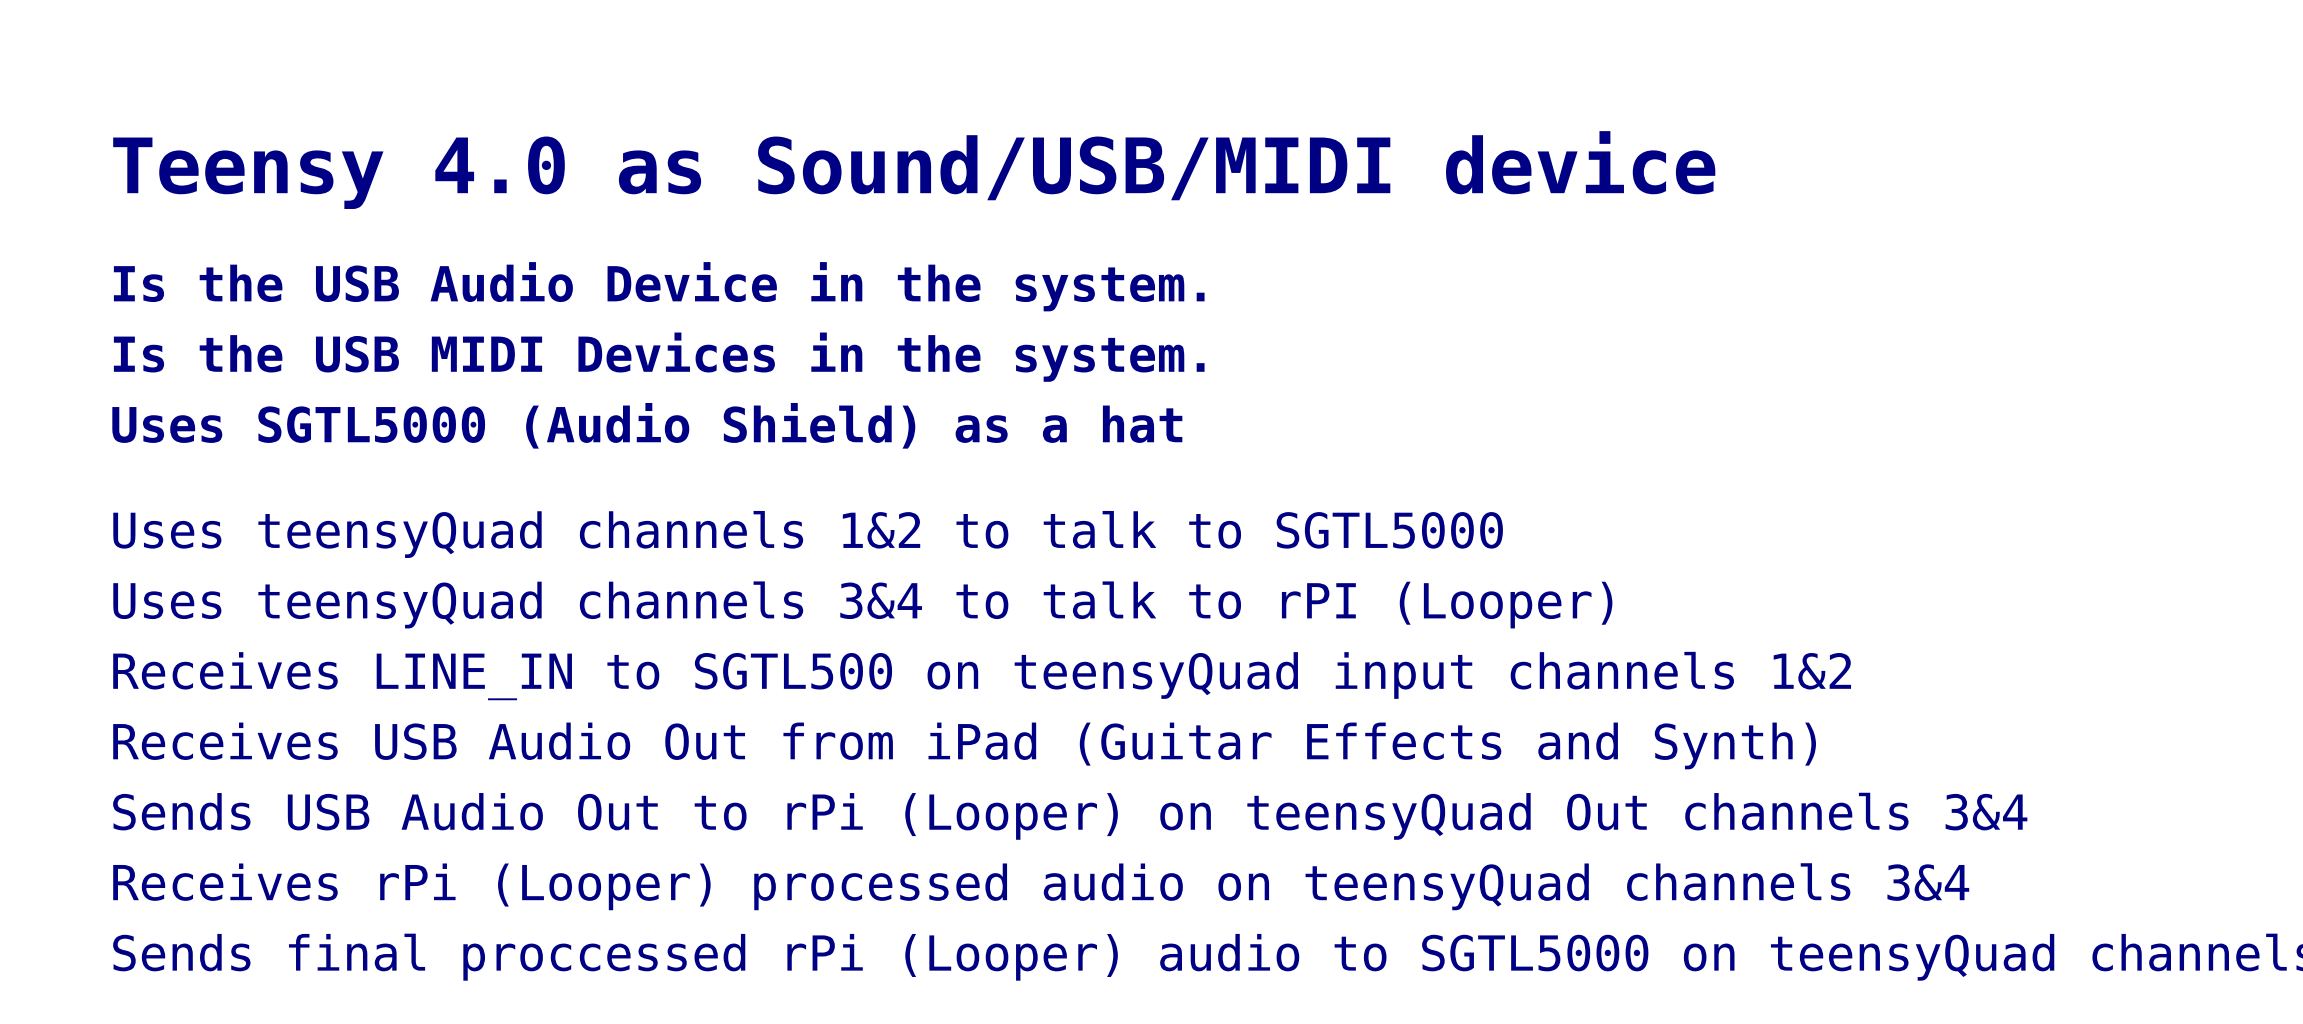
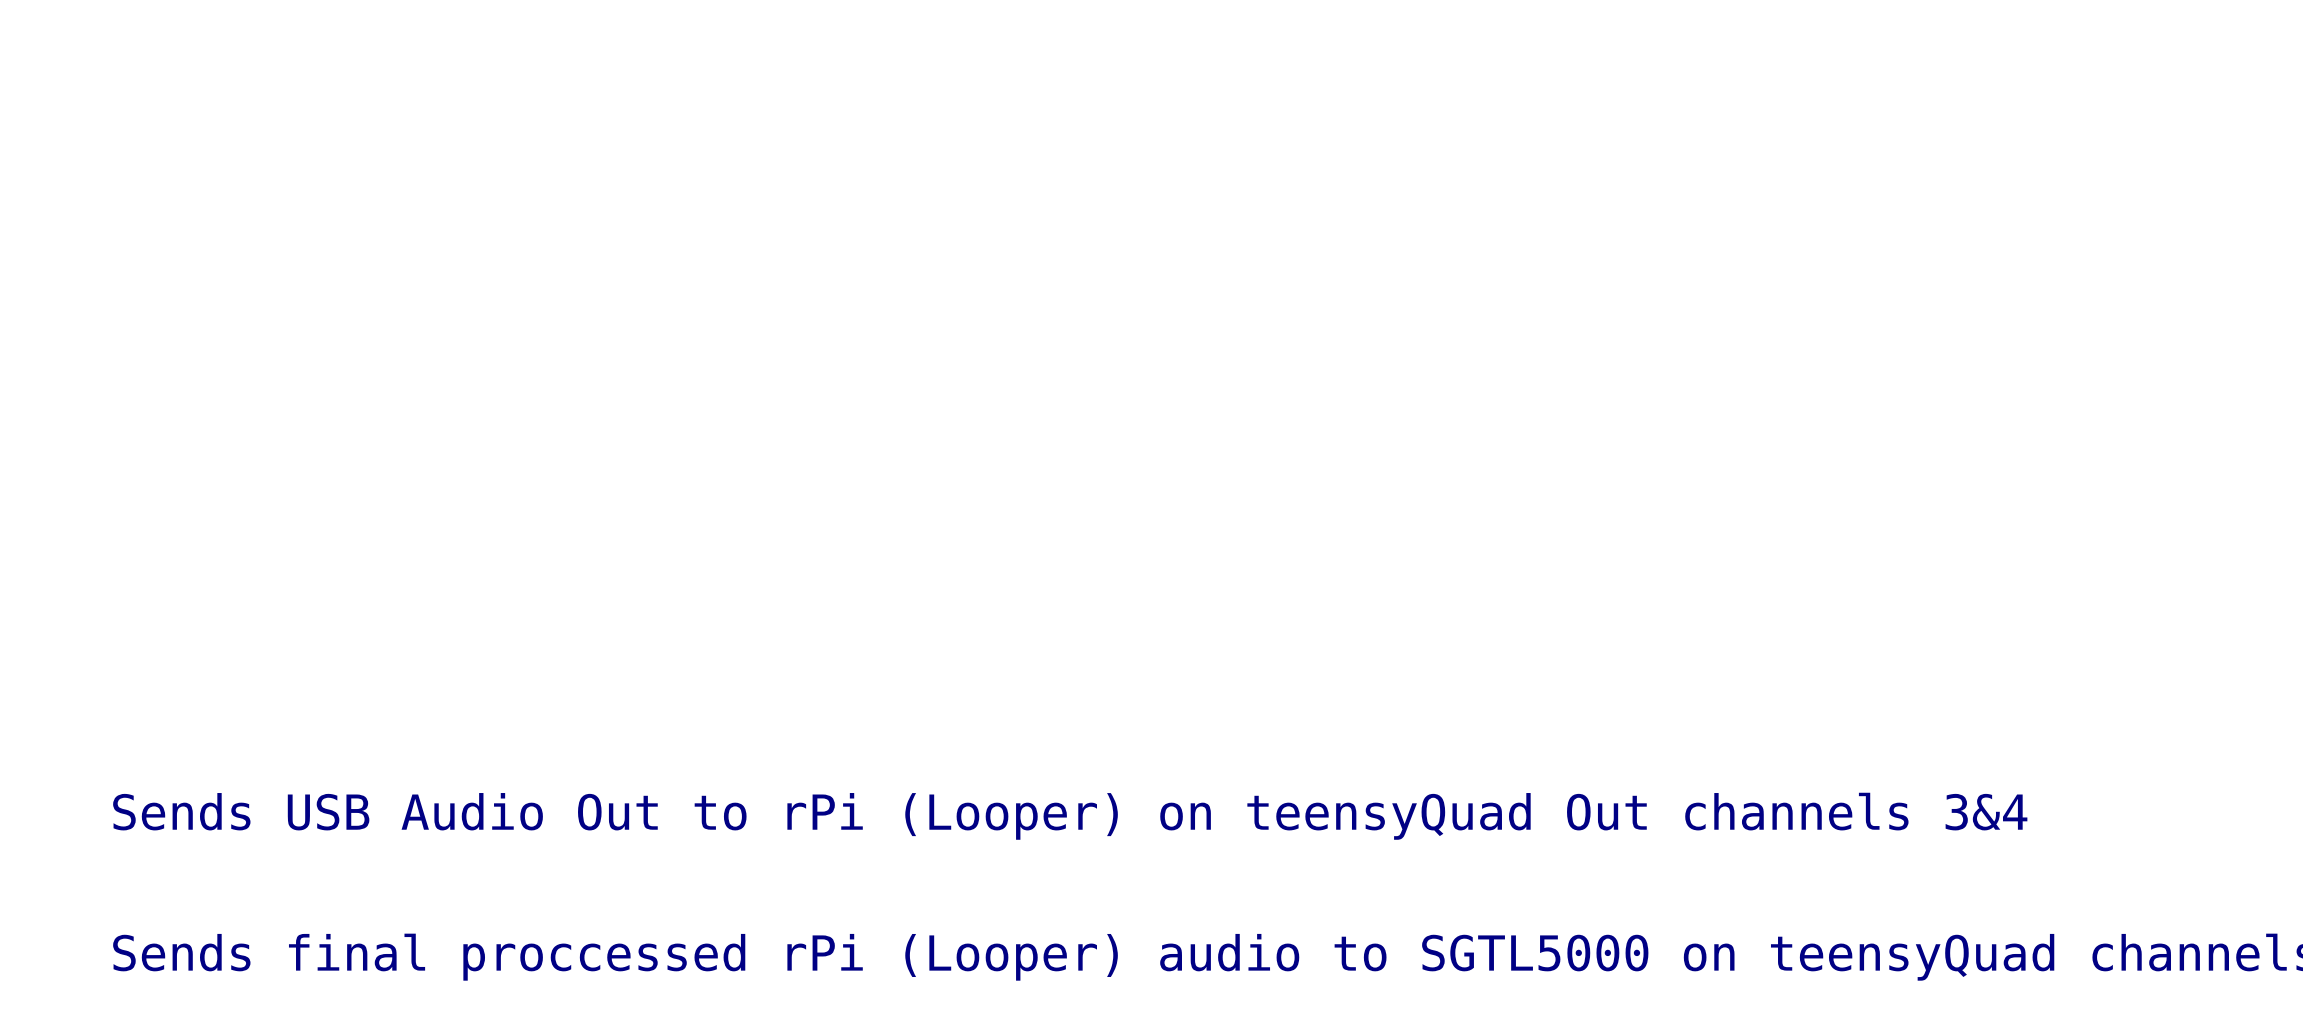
text: Teensy 4.0 as Sound/USB/MIDI device (914, 170) -> none
text: Is the USB Audio Device in the system. (659, 286) -> none
text: Is the USB MIDI Devices in the system. (659, 357) -> none
text: Uses SGTL5000 (Audio Shield) as a hat (647, 425) -> none
text: Uses teensyQuad channels 1&2 to talk to SGTL5000 (808, 534) -> none
text: Uses teensyQuad channels 3&4 to talk to rPI (Looper) (862, 604) -> none
text: Receives LINE_IN to SGTL500 on teensyQuad input channels 1&2 (982, 676) -> none
text: Receives USB Audio Out from iPad (Guitar Effects and Synth) (964, 745) -> none
text: Receives rPi (Looper) processed audio on teensyQuad channels 3&4 (1041, 886) -> none

